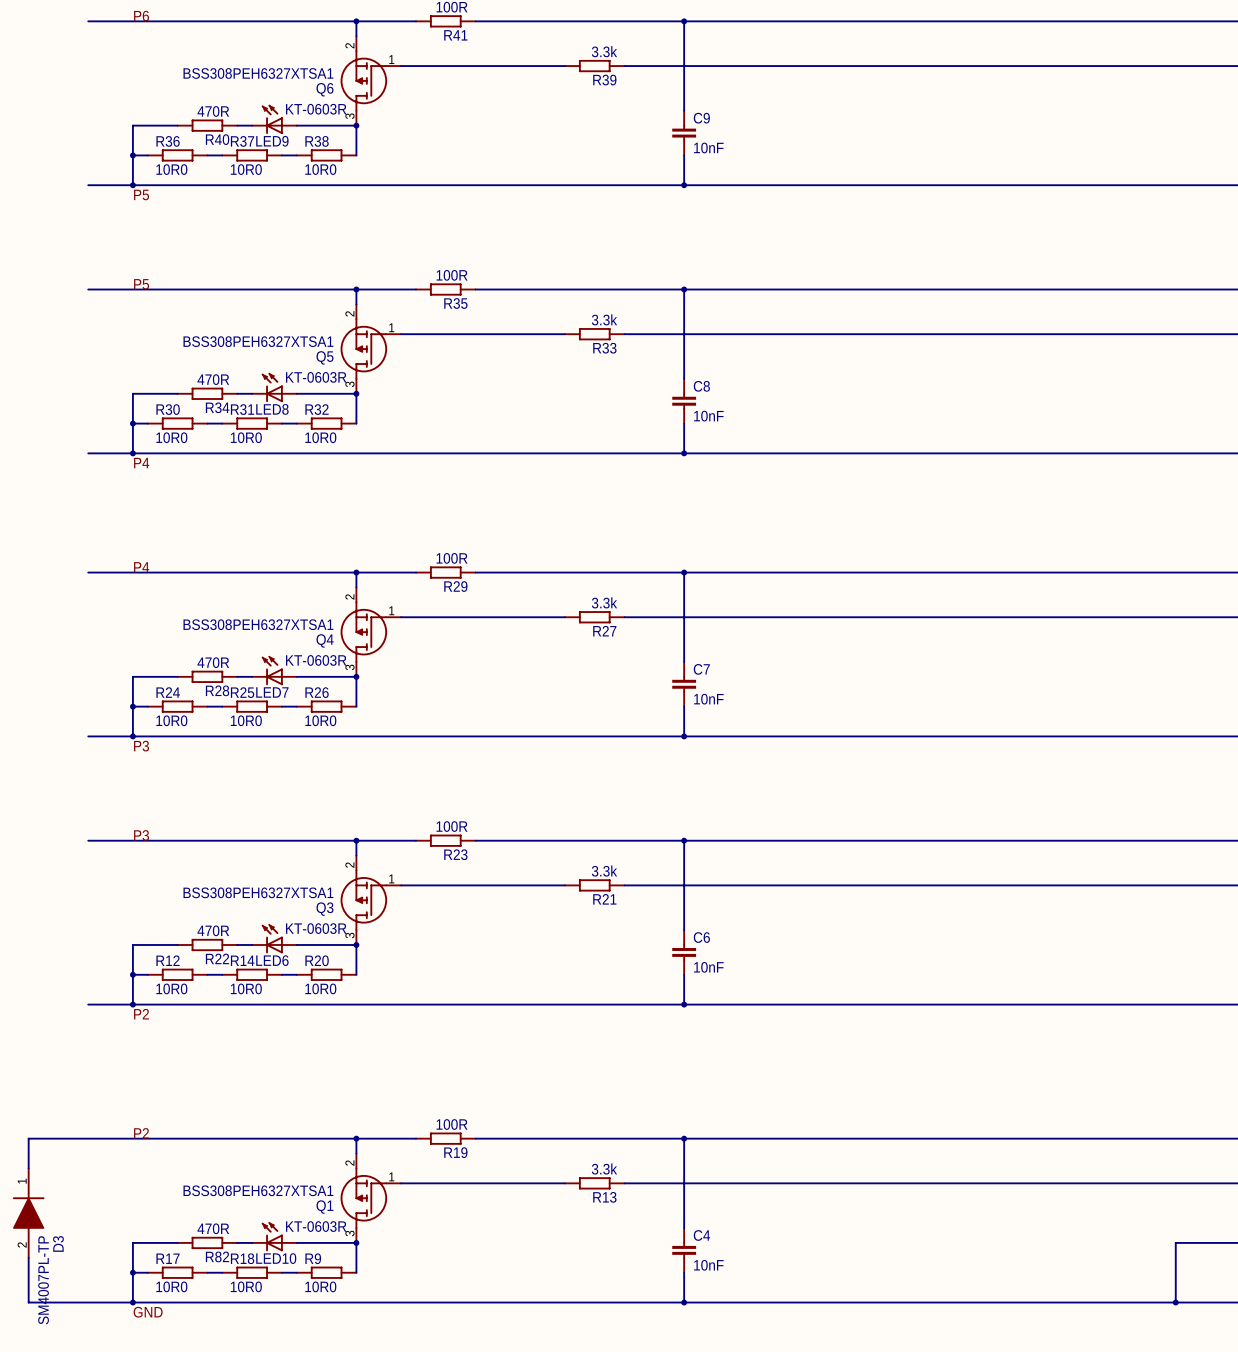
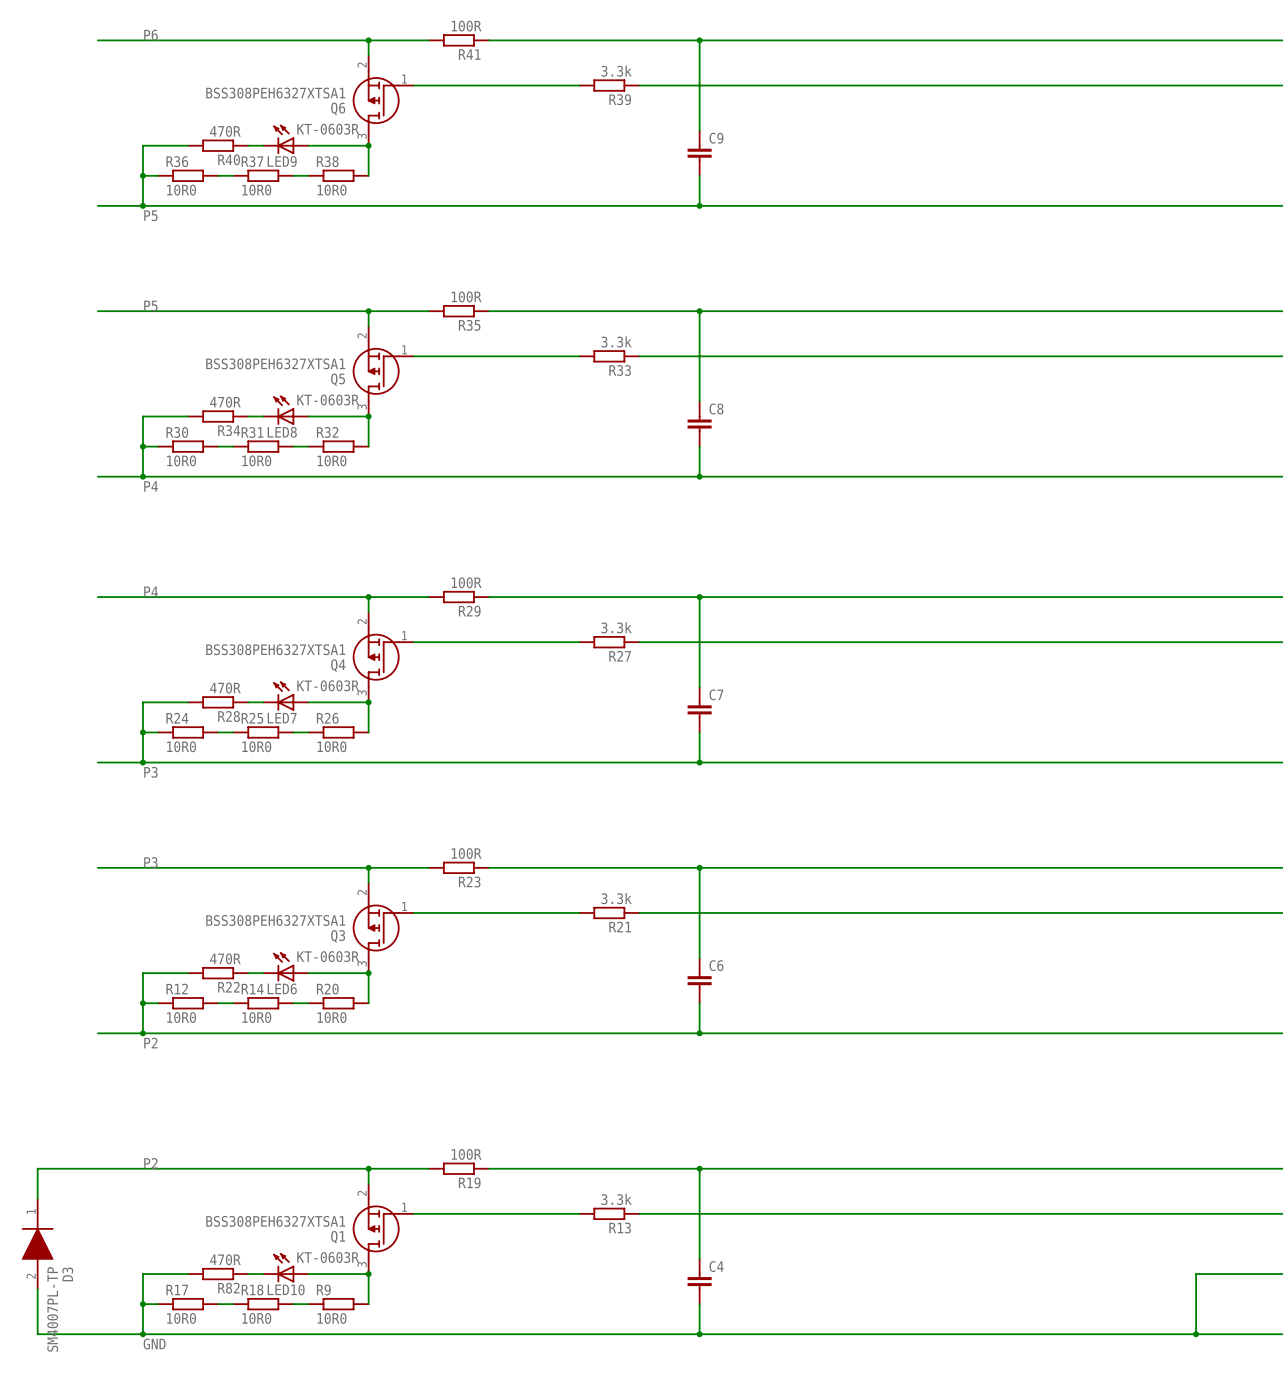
C9 value: 10nF (708, 147) -> none
C8 value: 10nF (708, 416) -> none
C7 value: 10nF (708, 699) -> none
C6 value: 10nF (708, 967) -> none
C4 value: 10nF (708, 1265) -> none

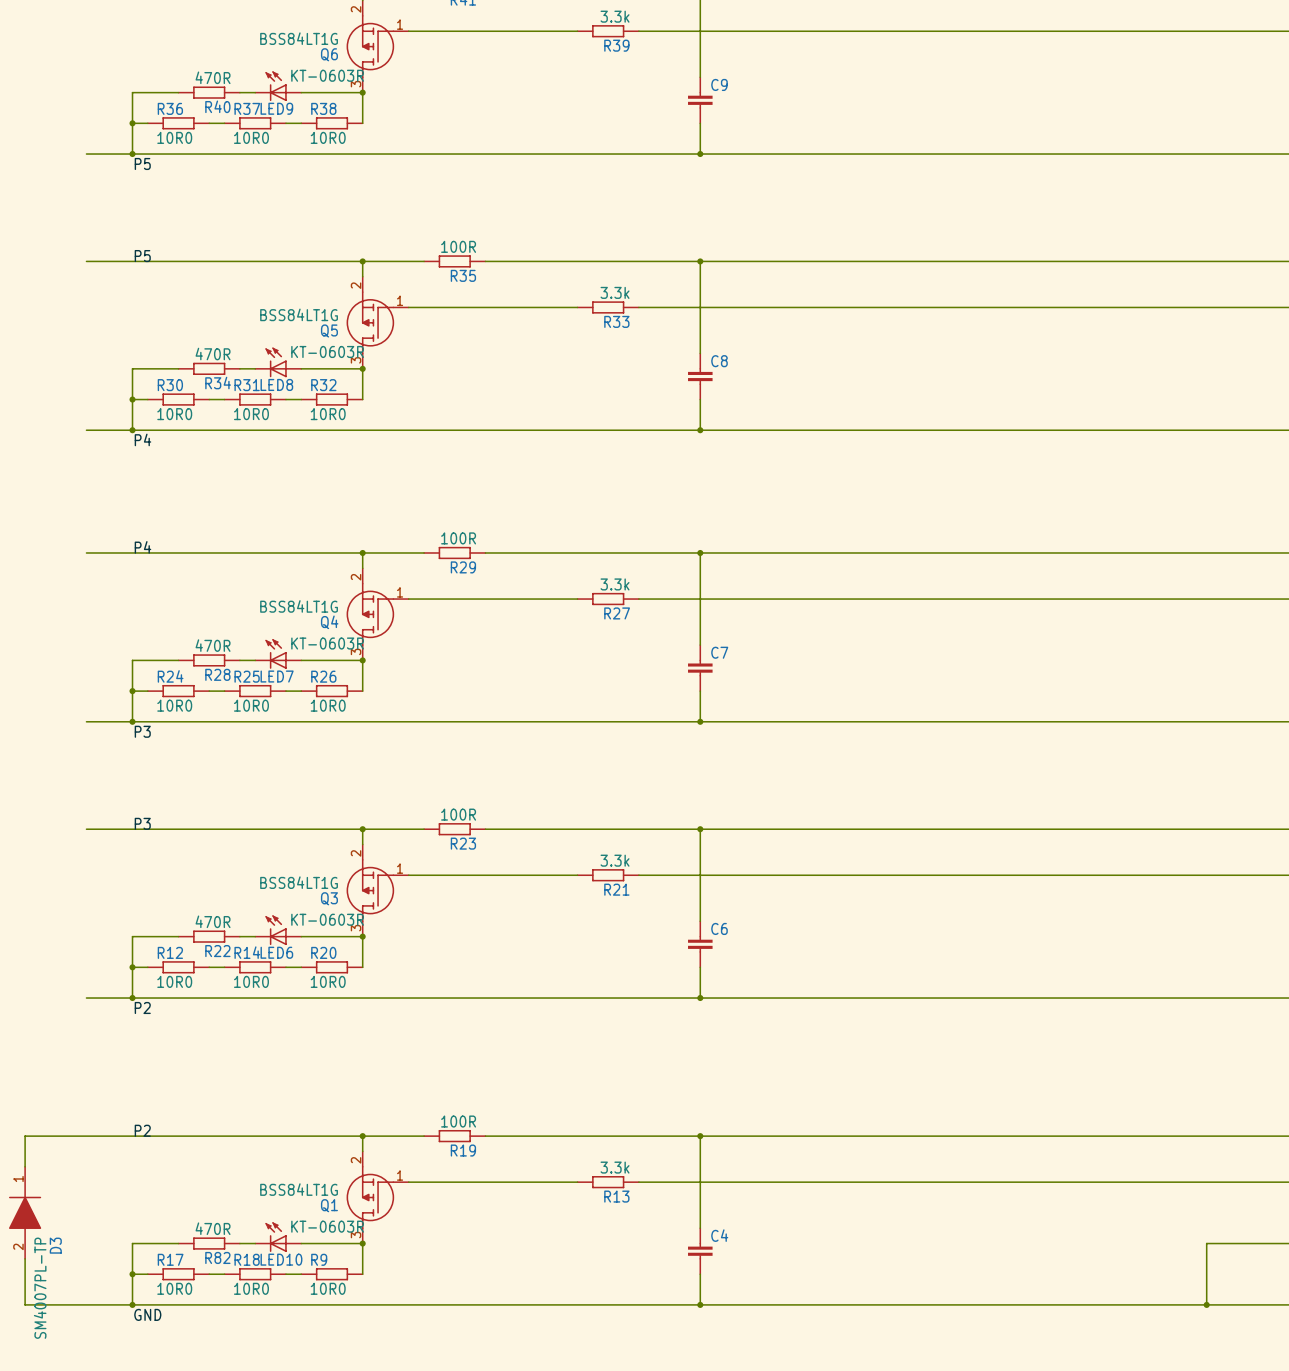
Q6 value: BSS308PEH6327XTSA1 (275, 93) -> BSS84LT1G (299, 38)
Q5 value: BSS308PEH6327XTSA1 (275, 363) -> BSS84LT1G (299, 314)
Q4 value: BSS308PEH6327XTSA1 (275, 649) -> BSS84LT1G (299, 606)
Q3 value: BSS308PEH6327XTSA1 (275, 920) -> BSS84LT1G (299, 882)
Q1 value: BSS308PEH6327XTSA1 (275, 1221) -> BSS84LT1G (299, 1189)

